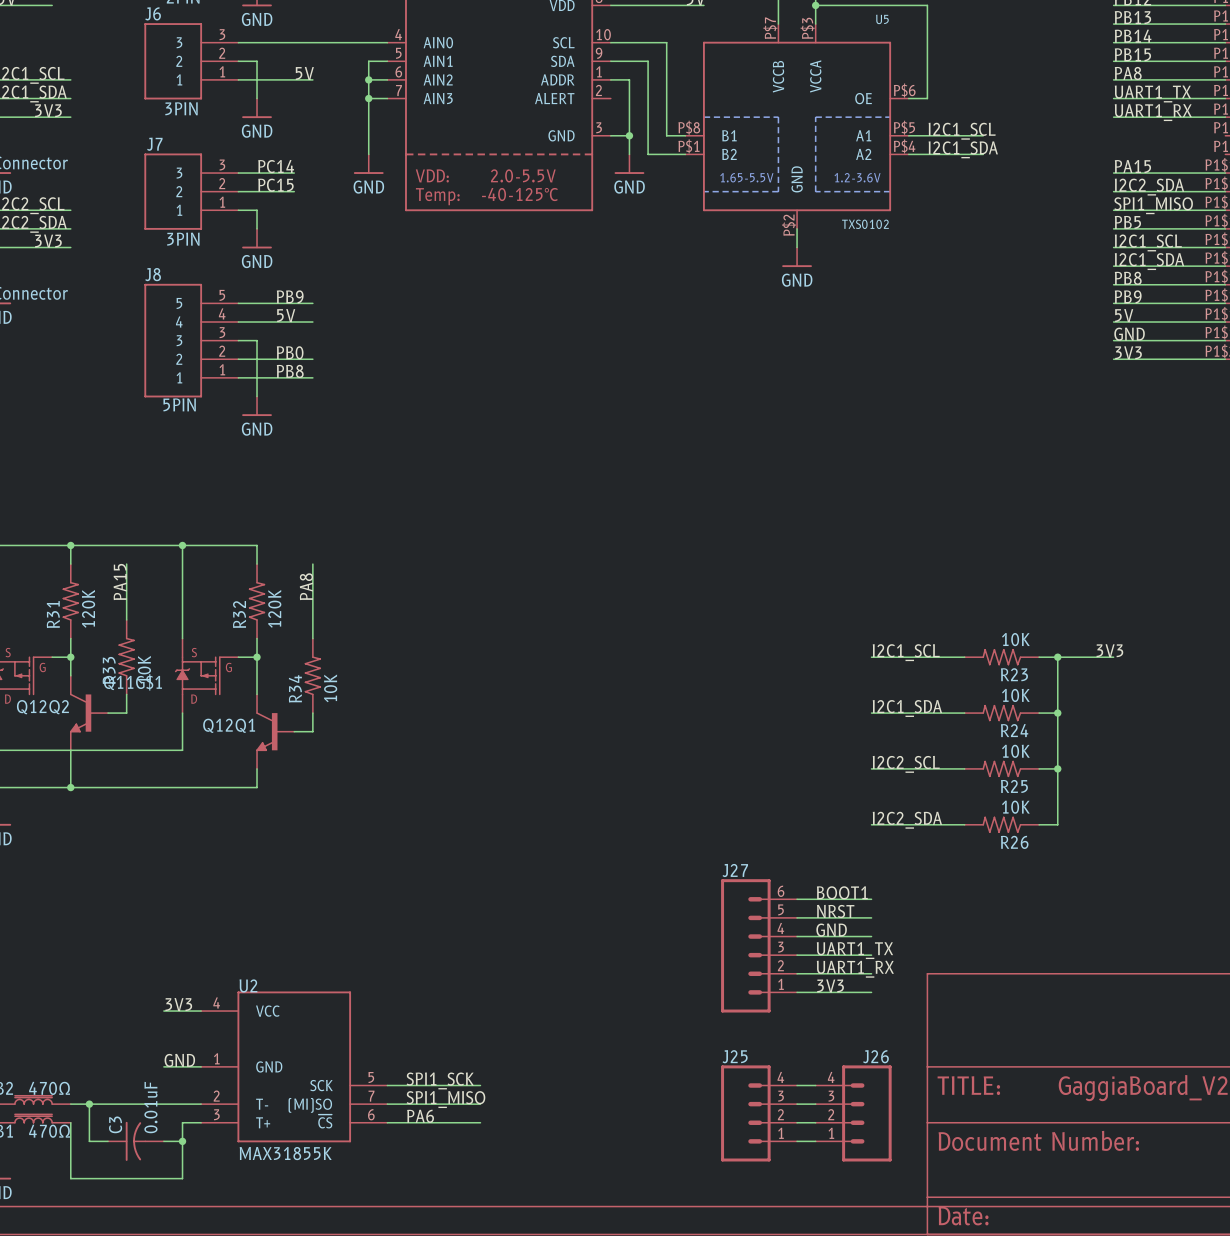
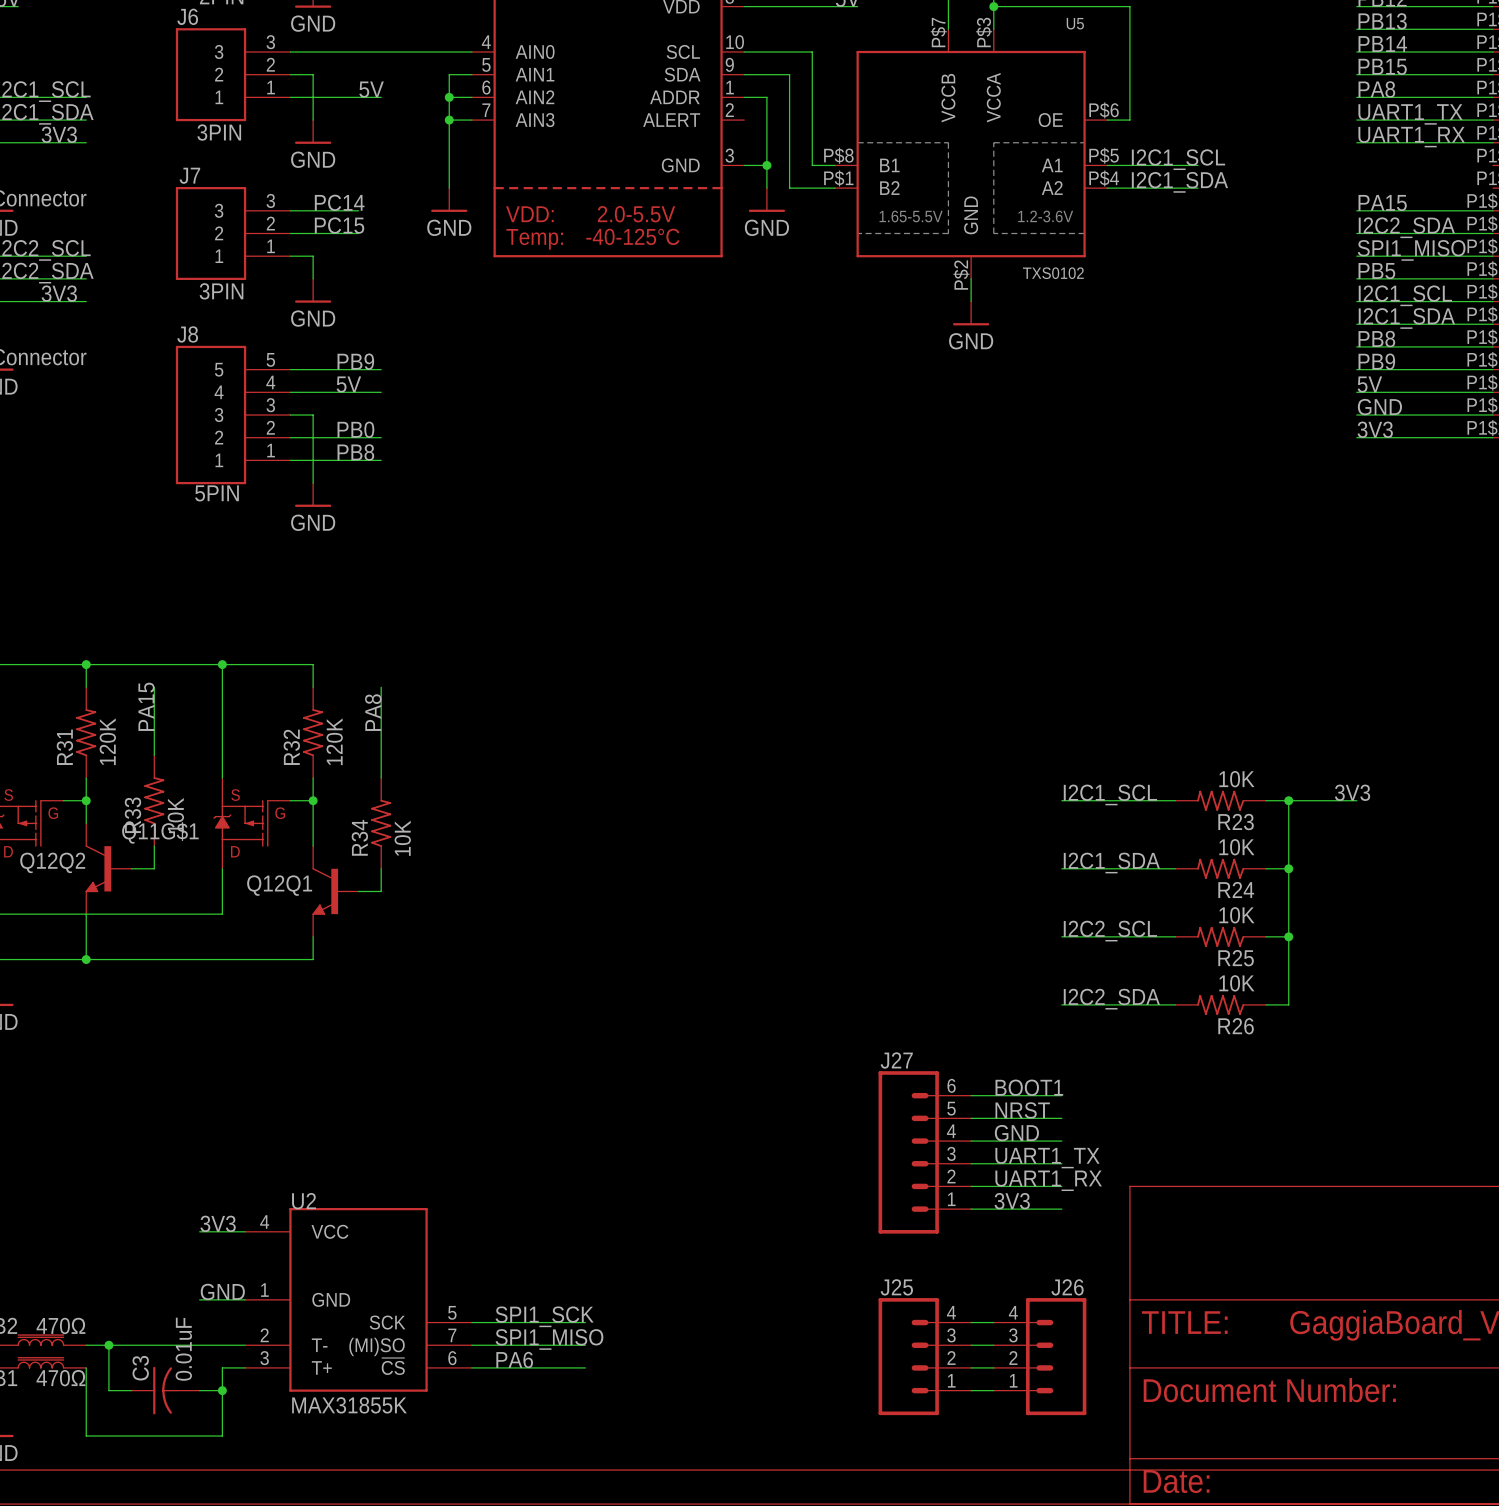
wire: (14, 5) (52, 5) -> none

